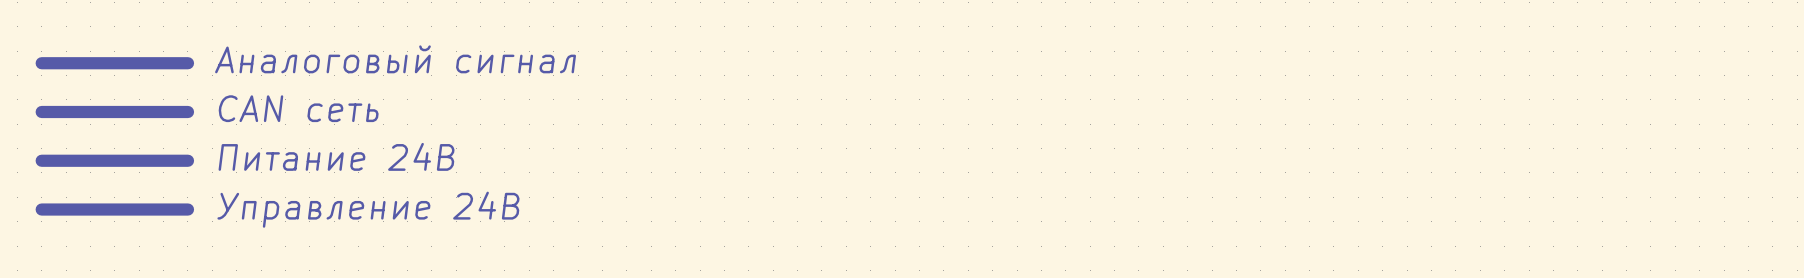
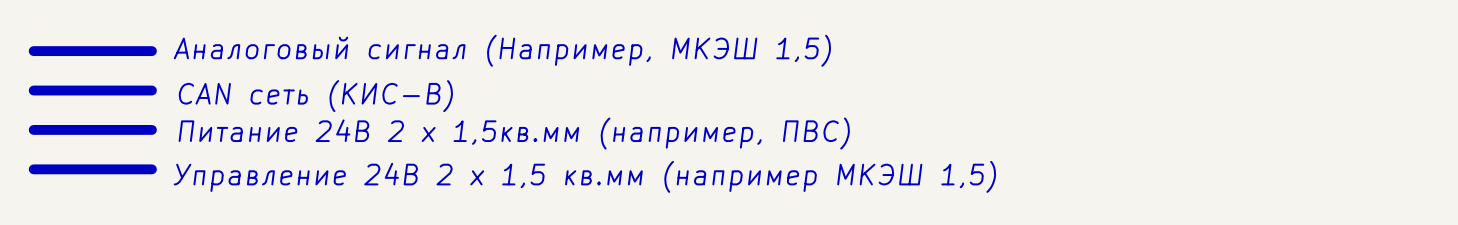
text: Аналоговый сигнал (395, 59) -> Аналоговый сигнал (Например, МКЭШ 1,5) (502, 50)
text: CAN сеть (298, 108) -> CAN сеть (КИС-В) (315, 96)
text: Питание 24В (336, 156) -> Питание 24В 2 x 1,5кв.мм (например, ПВС) (514, 133)
text: Управление 24В (368, 209) -> none
text: none -> Управление 24В 2 х 1,5 кв.мм (например МКЭШ 1,5) (584, 176)

